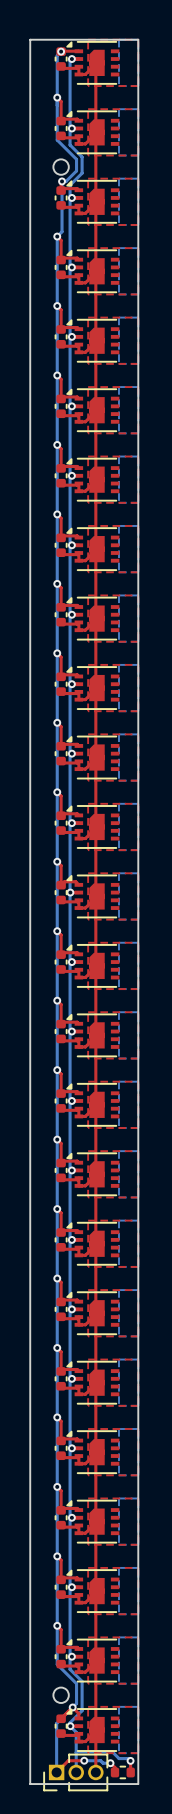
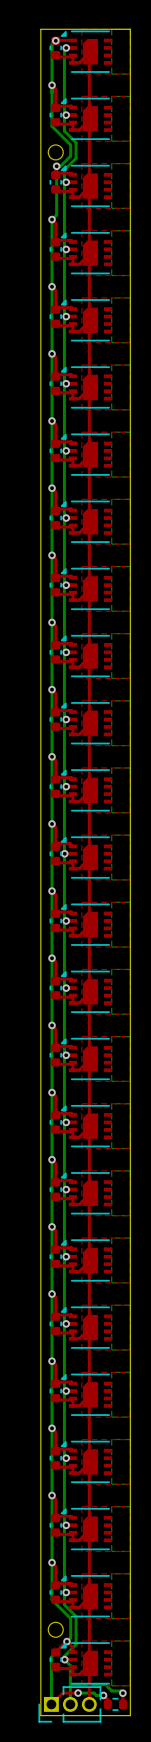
board edge: (45, 39) (30, 39) (30, 1784) (45, 1784) -> (40, 29) (40, 1715)

